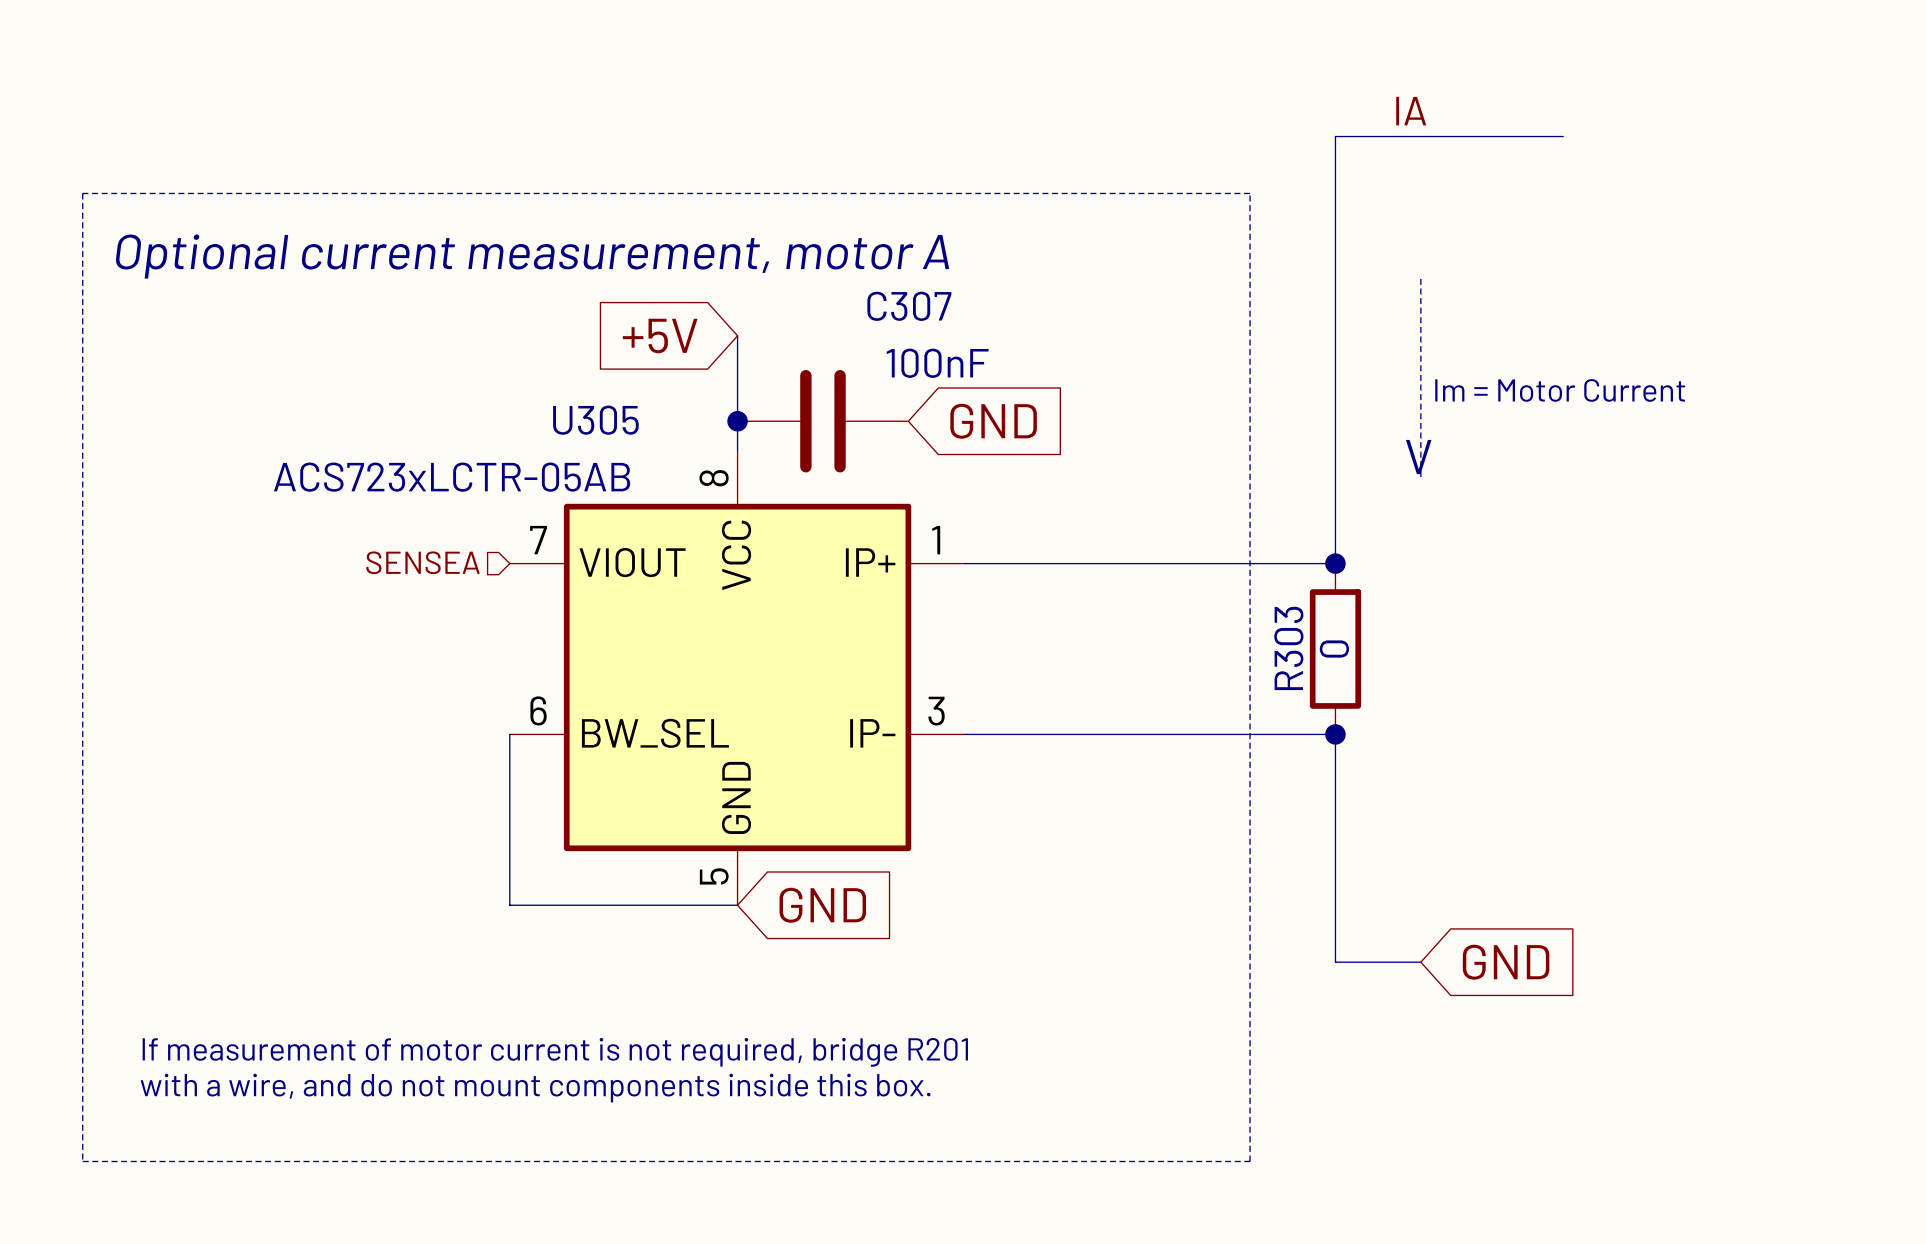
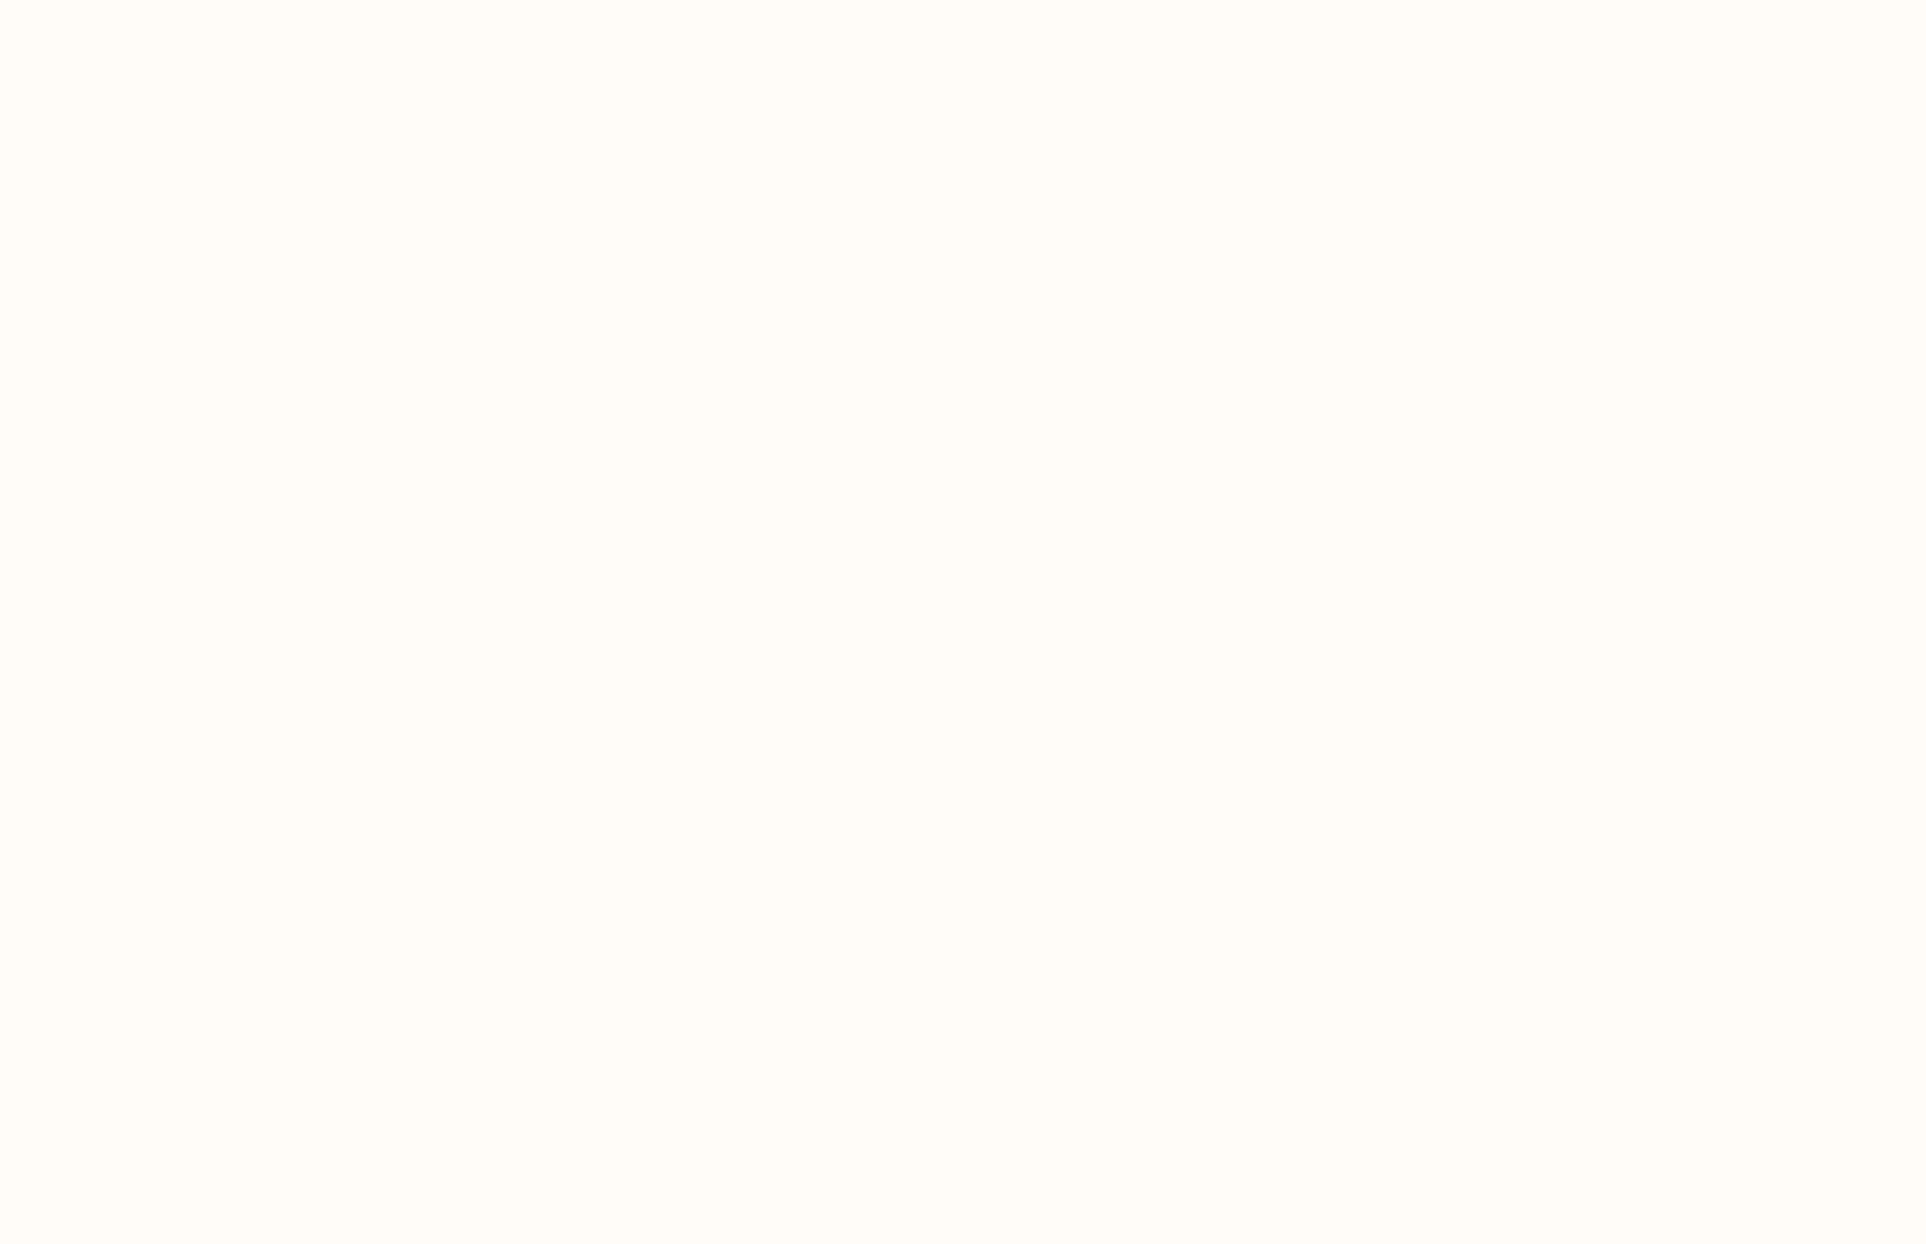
label: IA (1411, 111) -> none
wire: (1563, 136) (1335, 136) (1335, 563) (965, 563) -> none
line: (82, 193) (82, 1161) (1250, 1161) (1250, 193) (82, 193) -> none
text: Optional current measurement, motor A (532, 256) -> none
line: (1420, 278) (1420, 478) -> none
wire: (737, 335) (737, 449) -> none
global label: +5V (660, 336) -> none
text: Im = Motor Current (1560, 390) -> none
junction: (737, 421) -> none
C307: 100nF (822, 421) -> none
global label: GND (993, 421) -> none
text: V (1418, 457) -> none
hierarchical label: SENSEA (423, 562) -> none
junction: (1335, 563) -> none
R303: 0 (1335, 649) -> none
U305: ACS723xLCTR-05AB (737, 677) -> none
wire: (509, 734) (509, 905) (737, 905) -> none
wire: (965, 734) (1335, 734) (1335, 962) (1420, 962) -> none
junction: (1335, 734) -> none
global label: GND (822, 905) -> none
global label: GND (1506, 962) -> none
text: If measurement of motor current is not required, bridge R201 (555, 1052) -> none
text: with a wire, and do not mount components inside this box. (535, 1088) -> none

